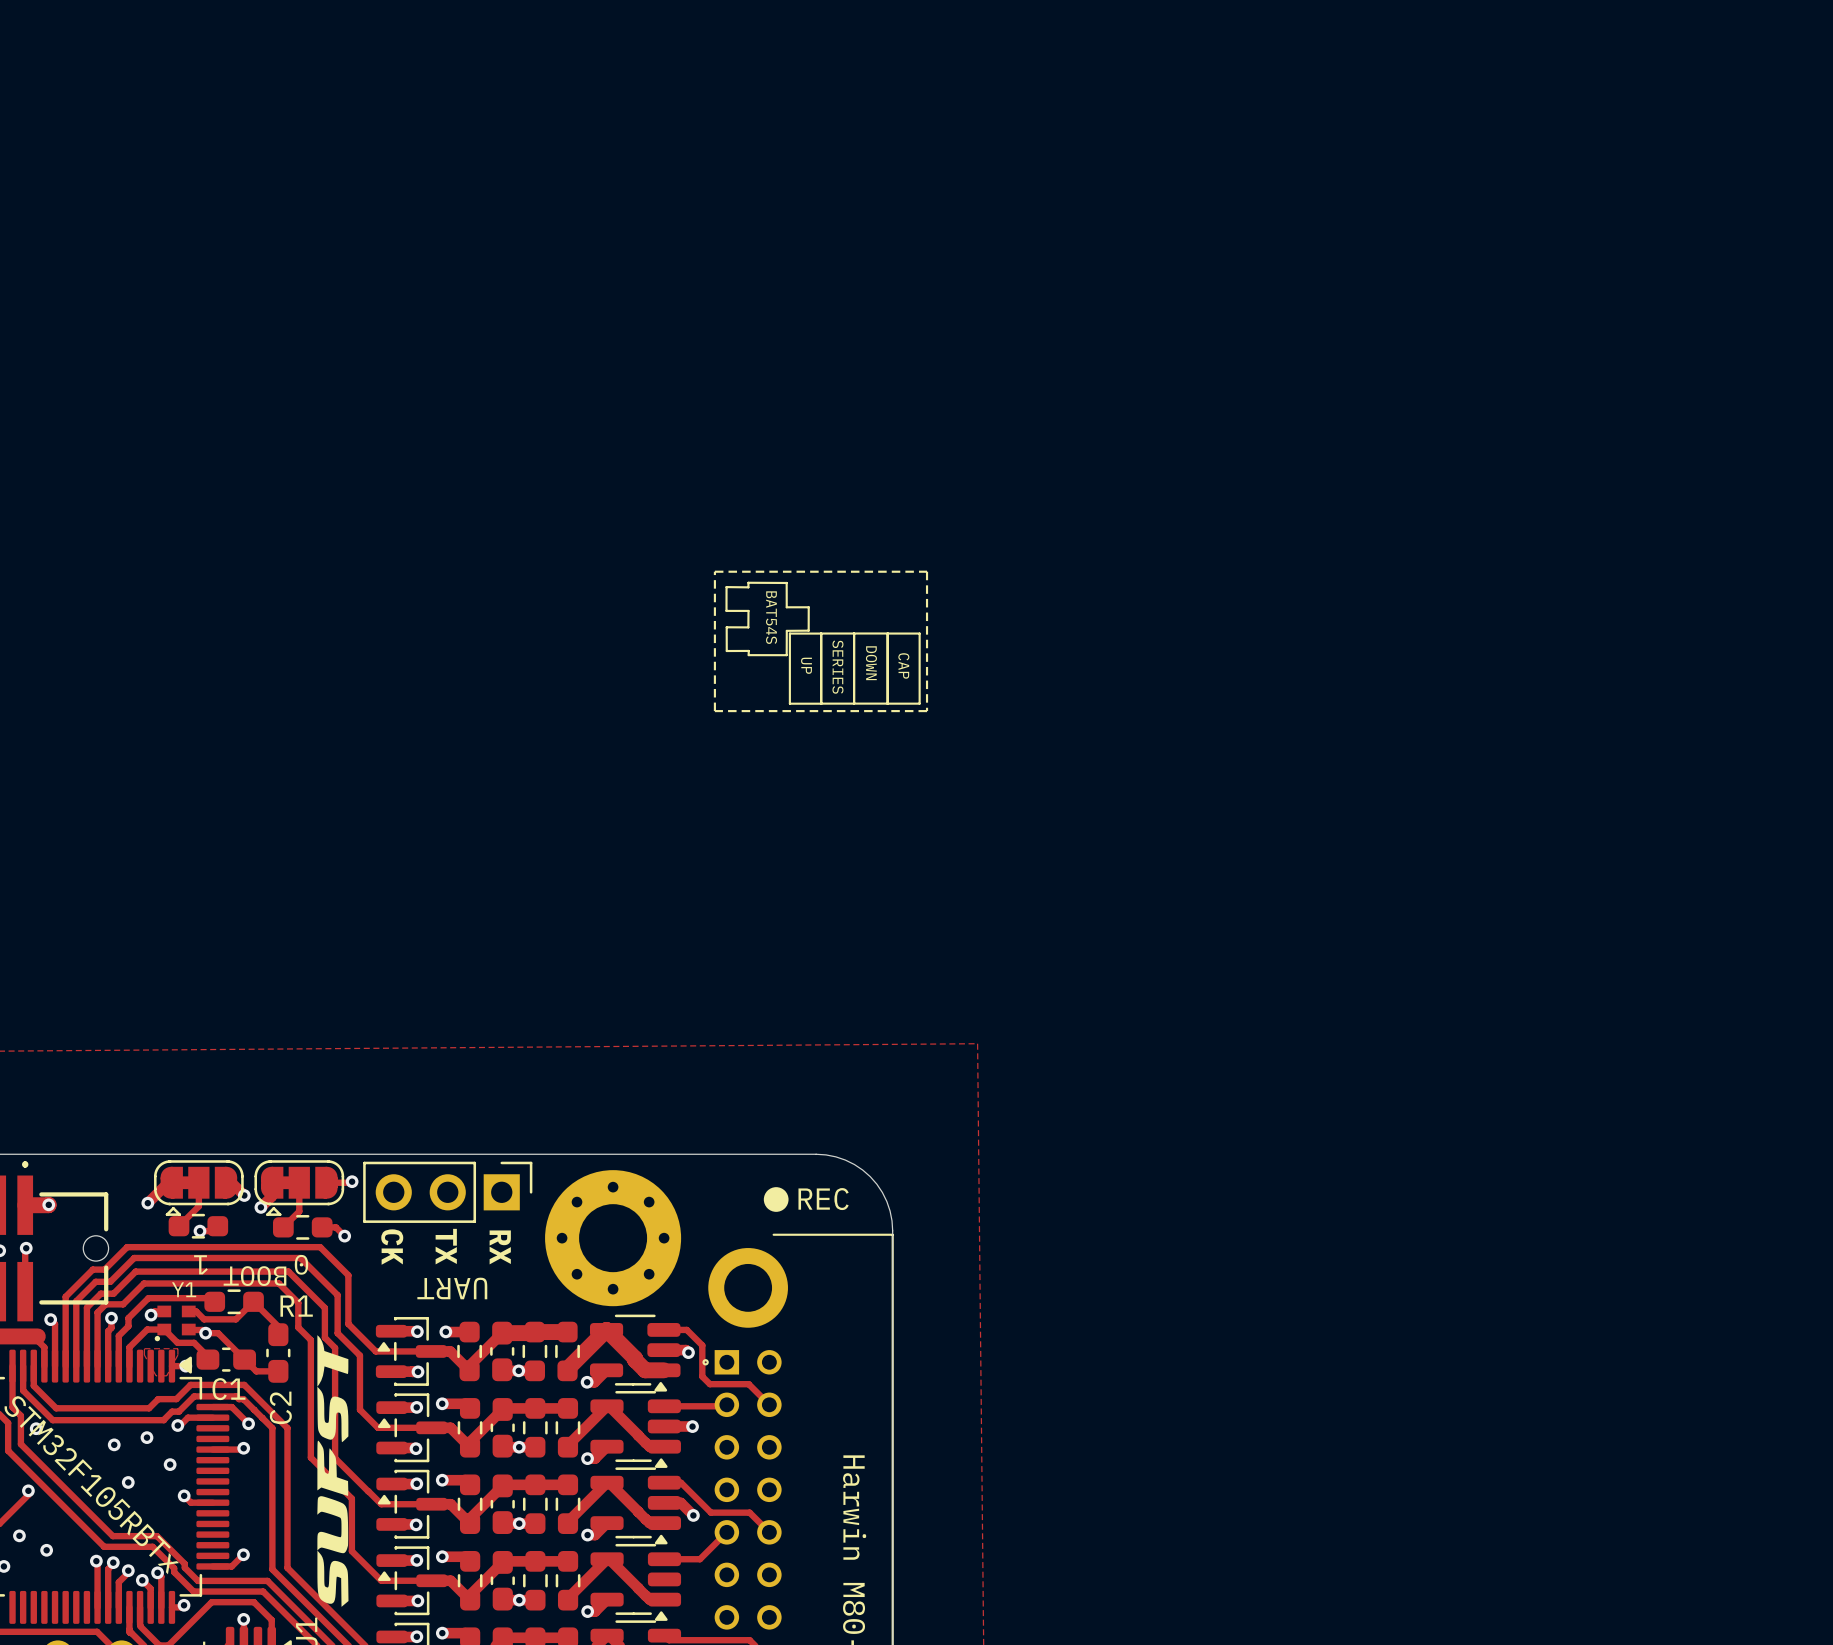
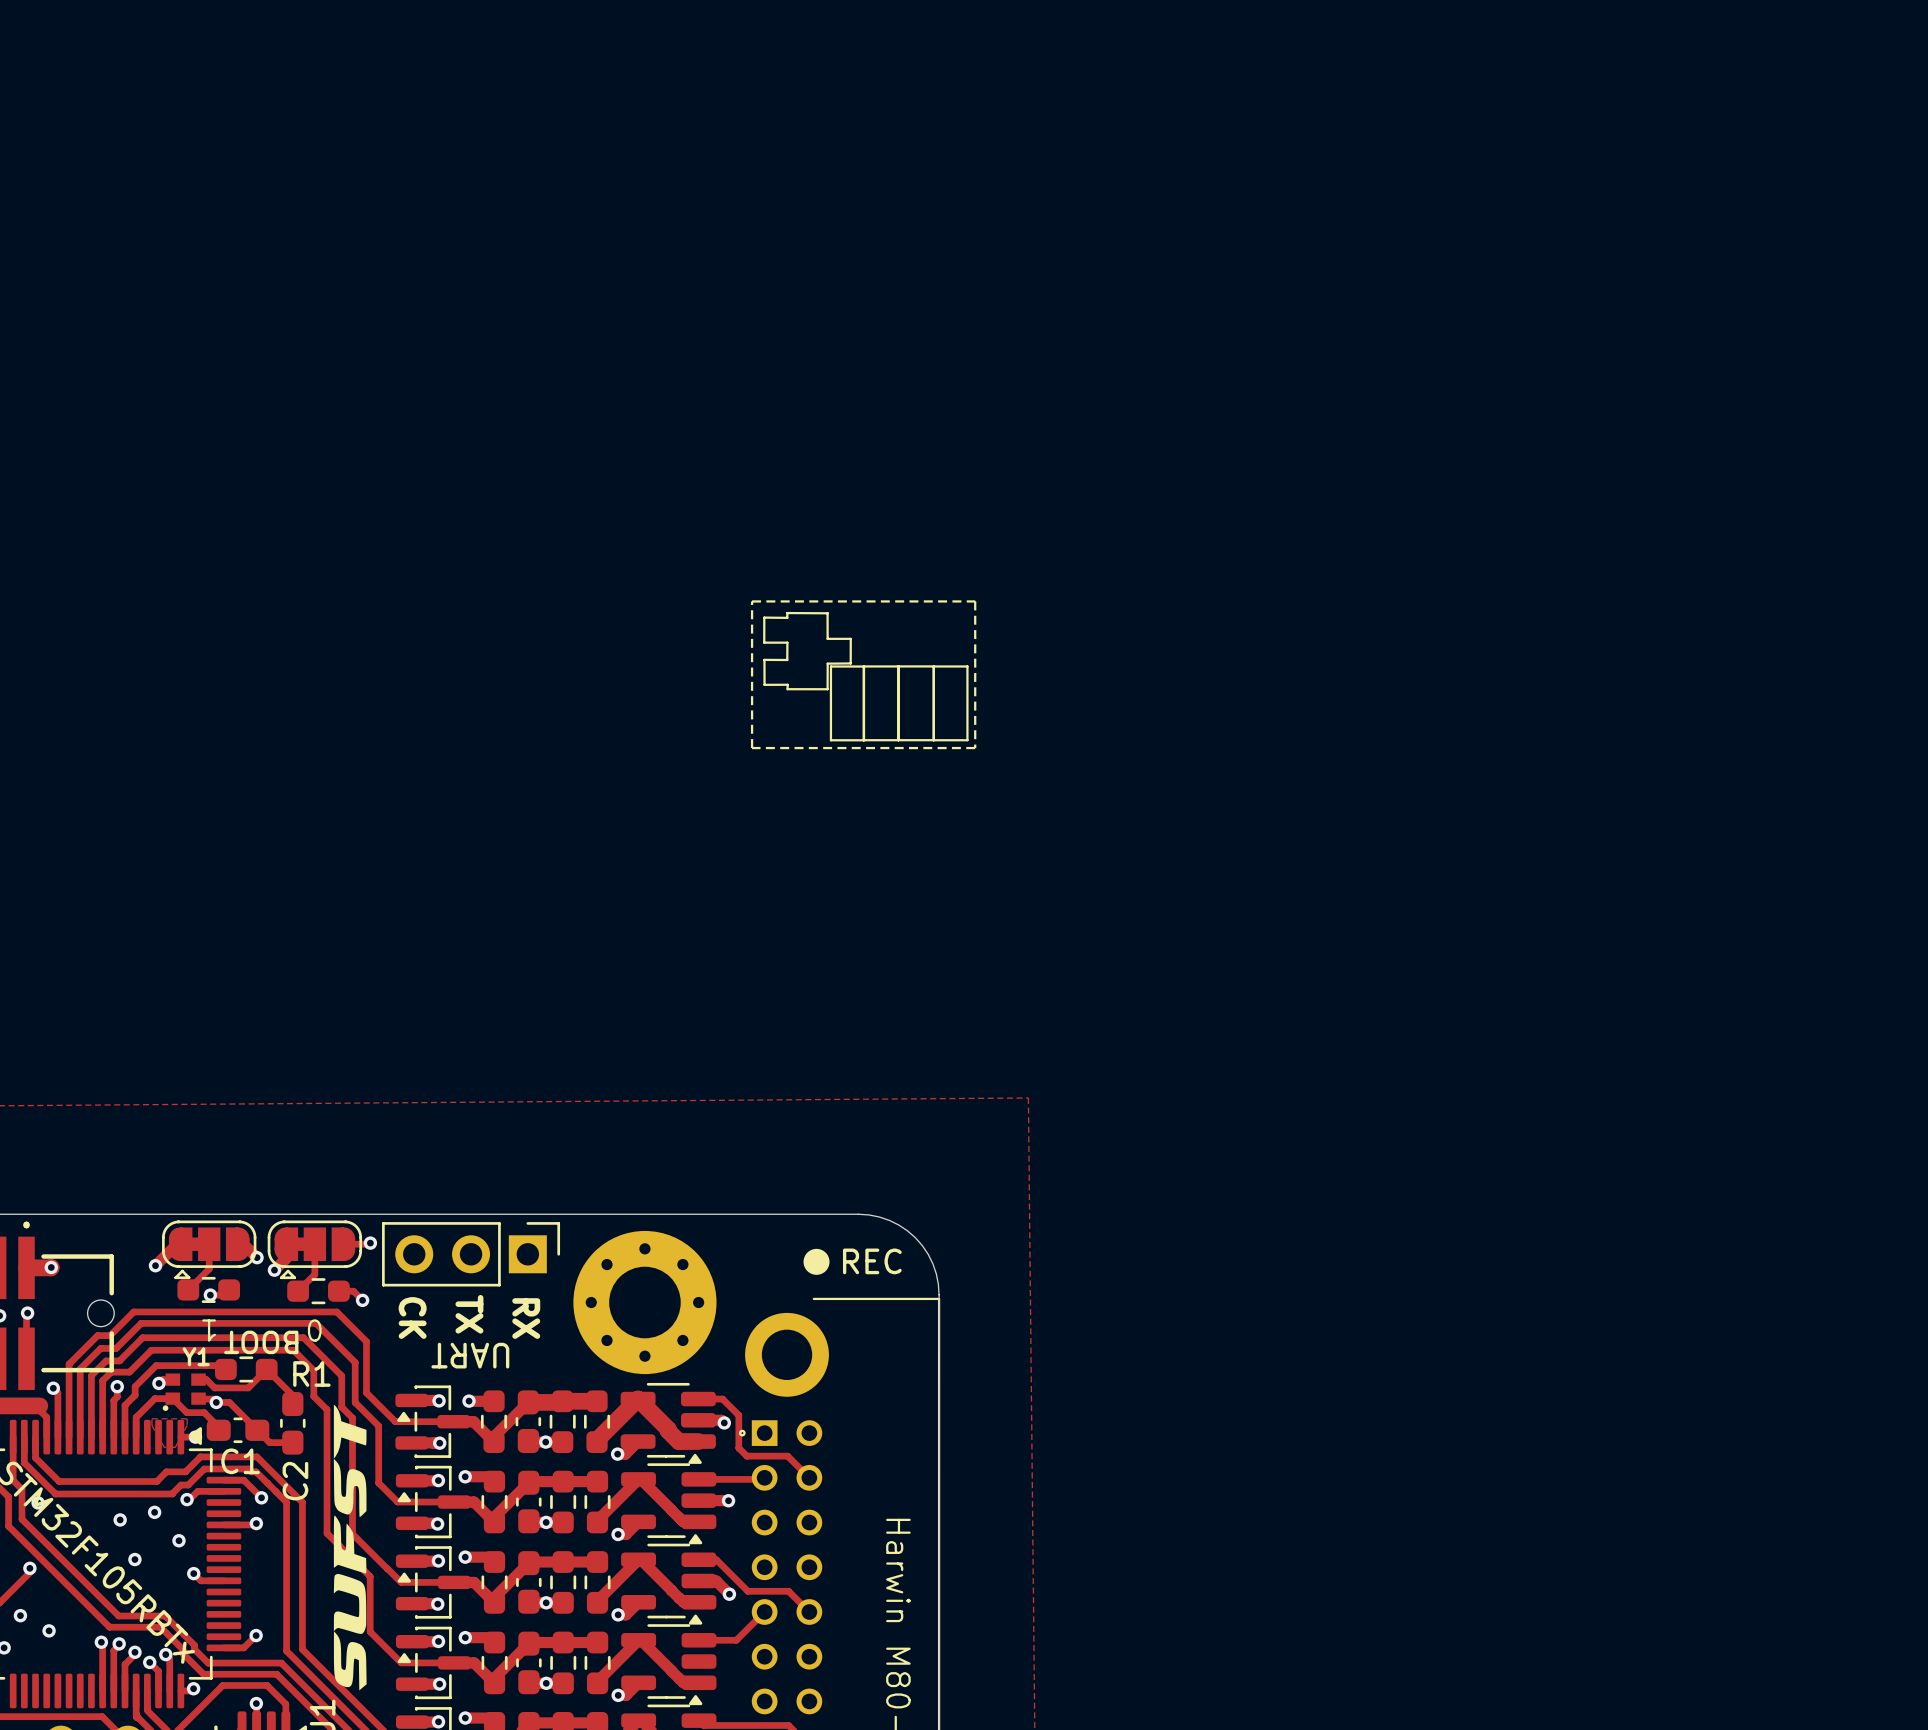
text: BAT54S (771, 617) -> none
text: DOWN (871, 663) -> none
text: UP (806, 665) -> none
text: CAP (903, 665) -> none
text: SERIES (837, 667) -> none

